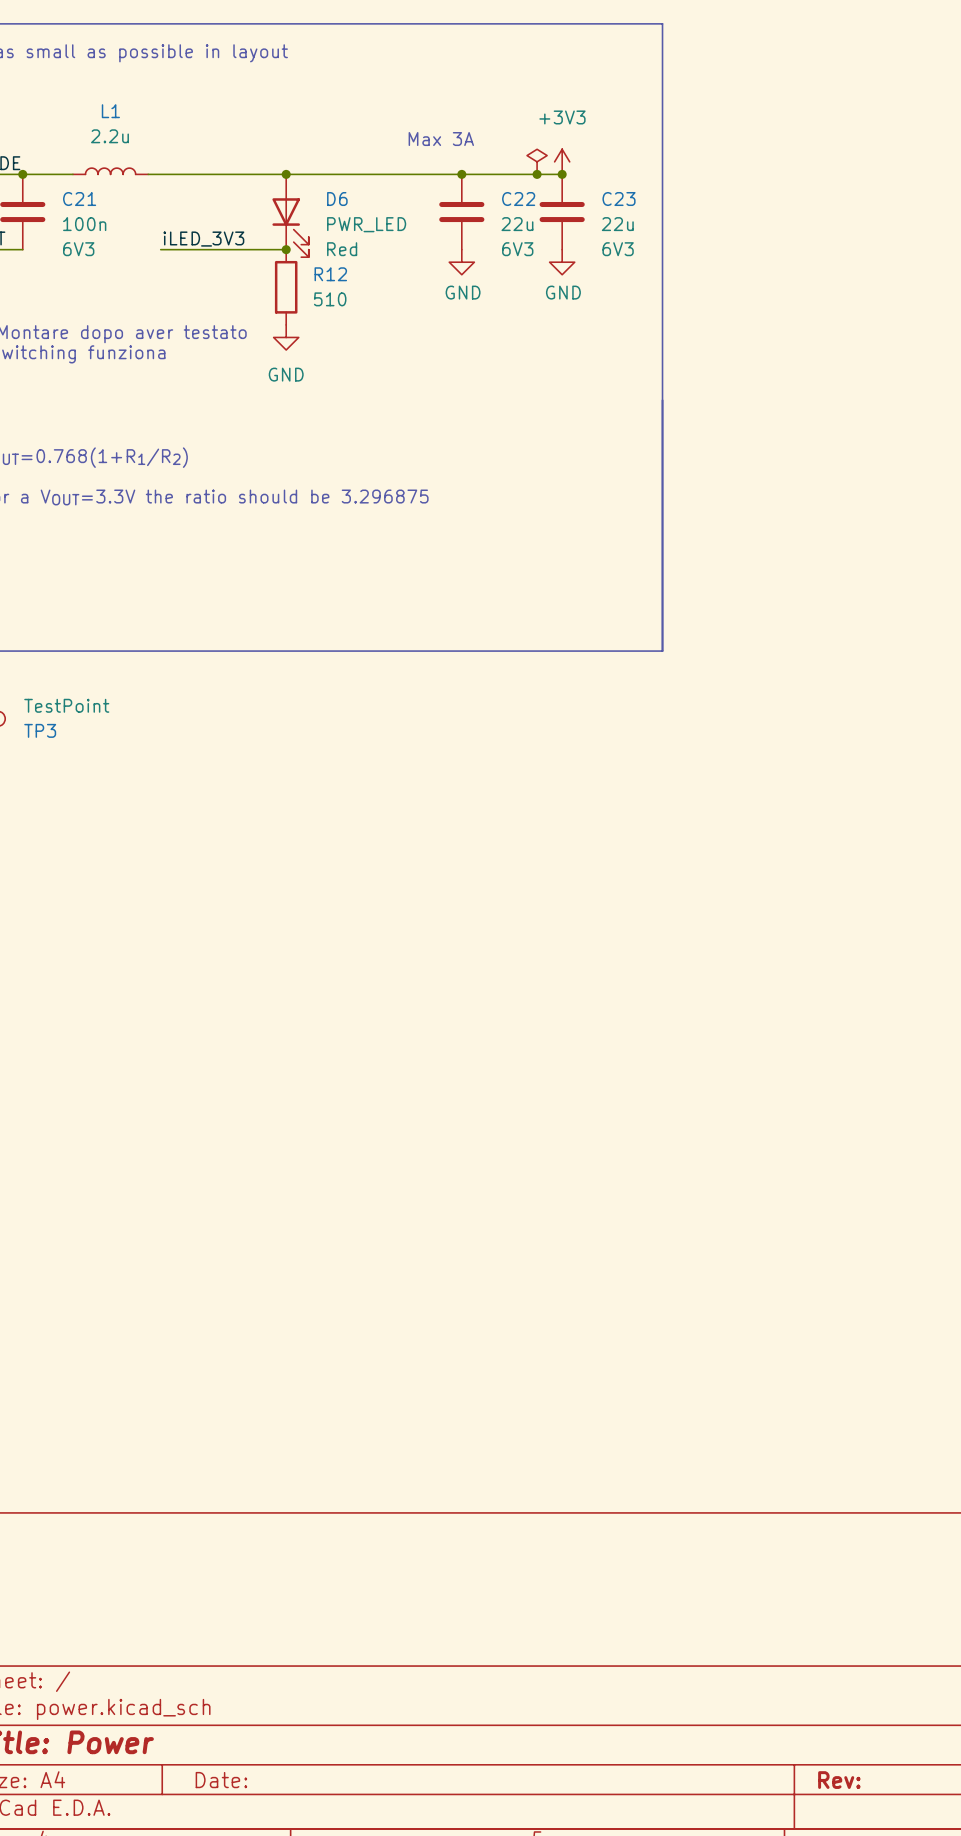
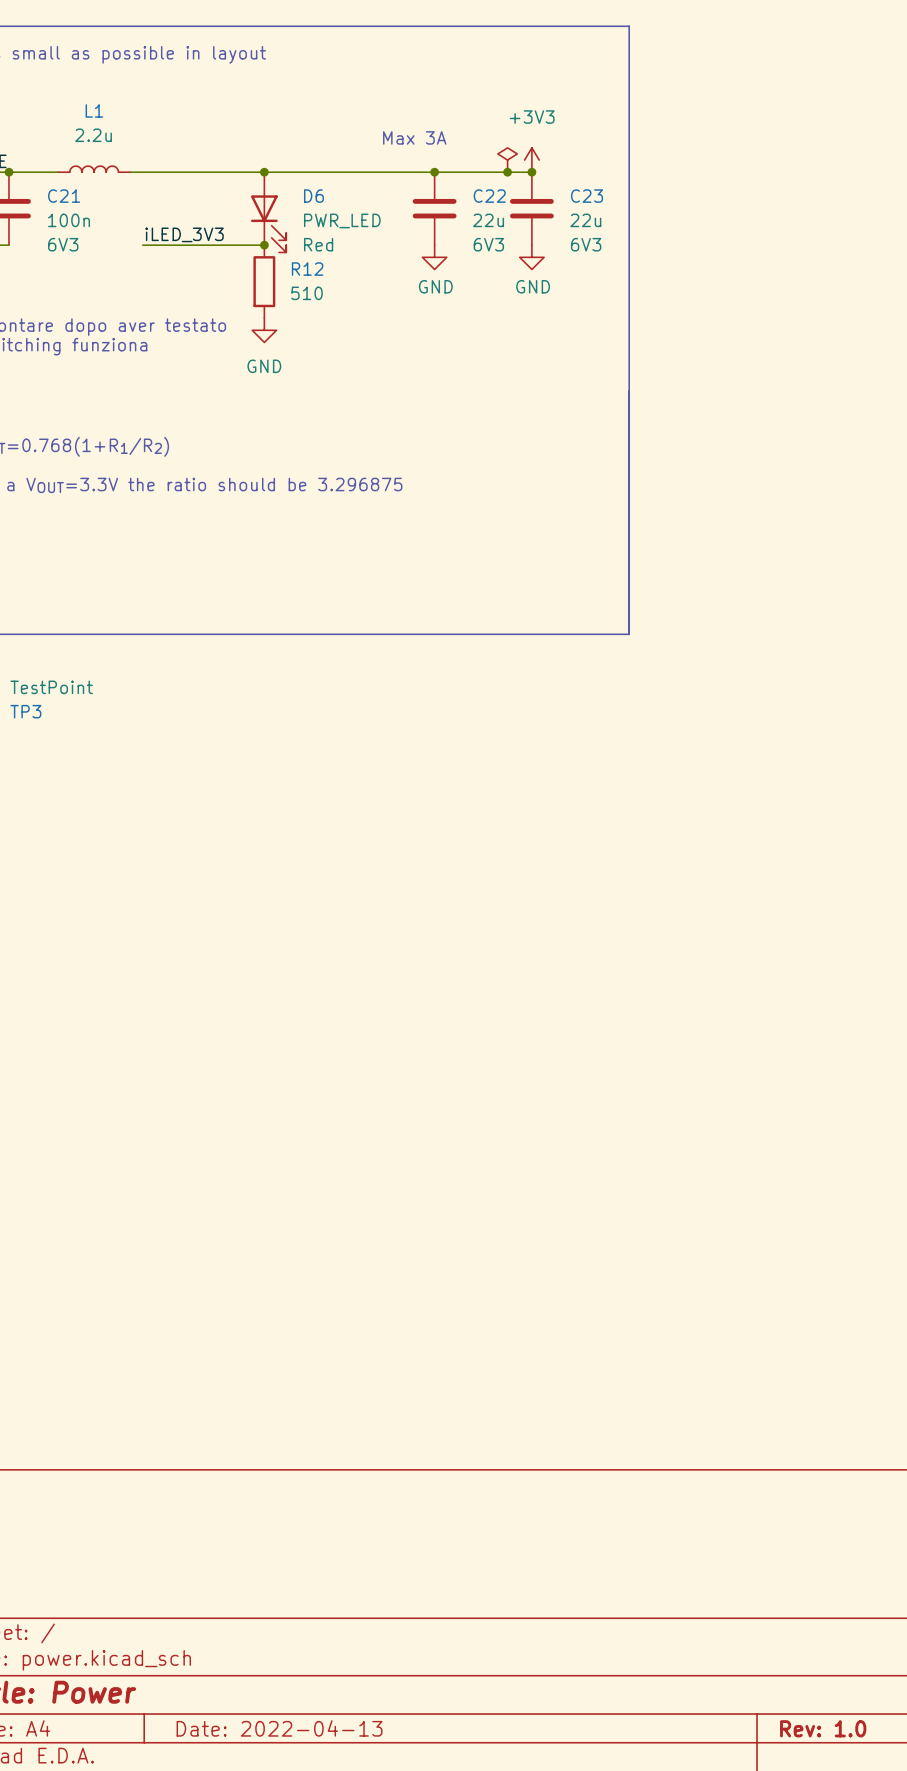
title block: Date: (221, 1780) -> Date: 2022-04-13 (279, 1728)
title block: Rev: (839, 1780) -> Rev: 1.0 (823, 1728)

